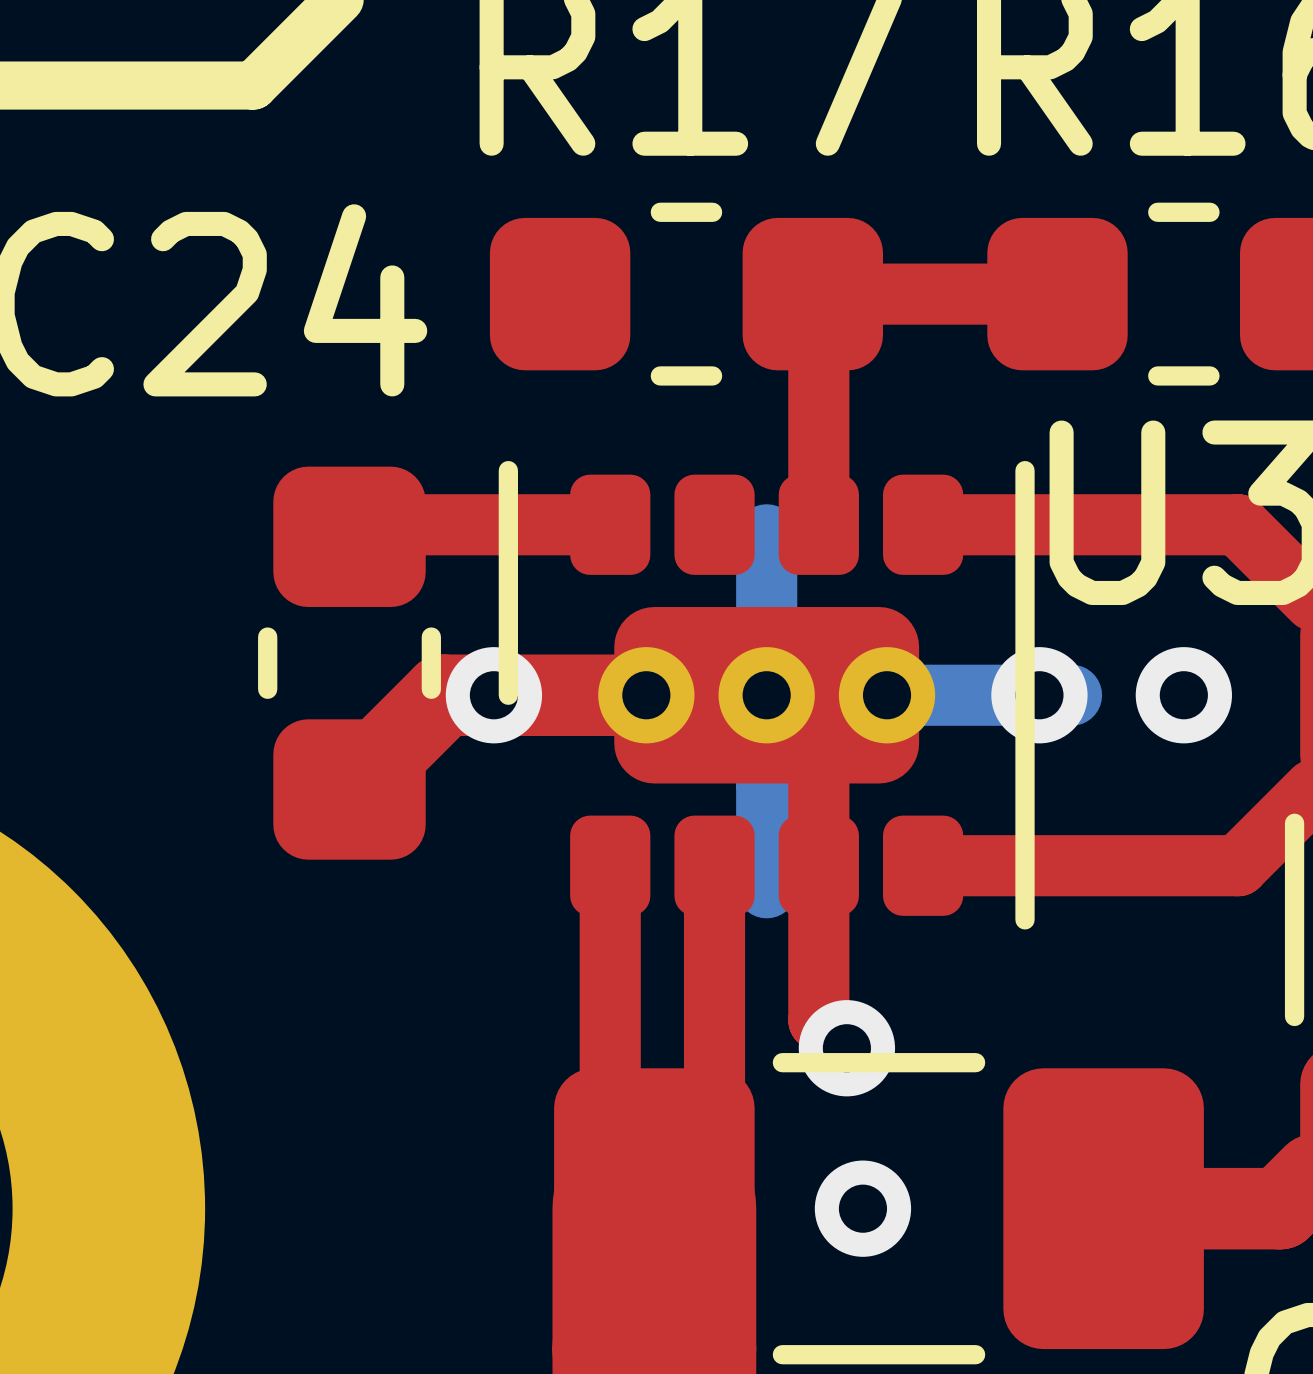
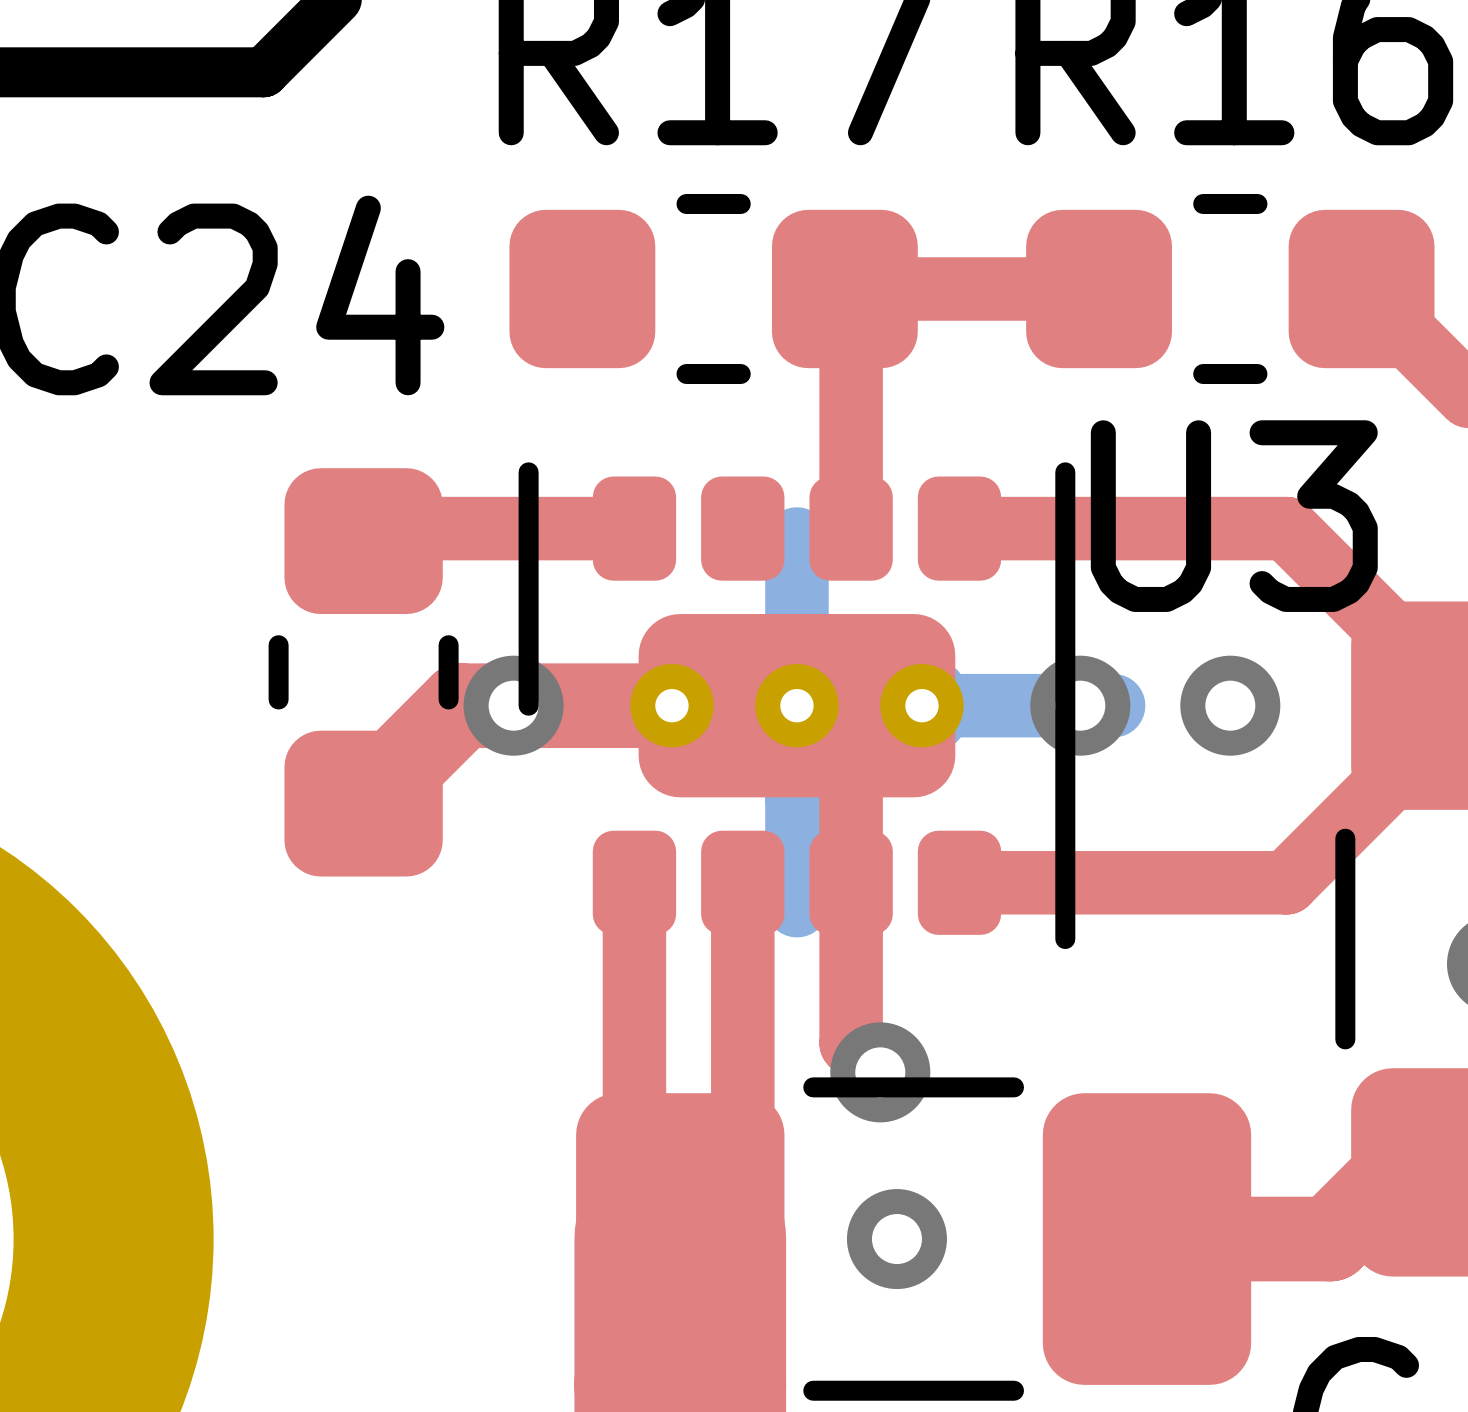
U3 footprint: [498, 460, 1035, 930] -> [518, 462, 1076, 950]

